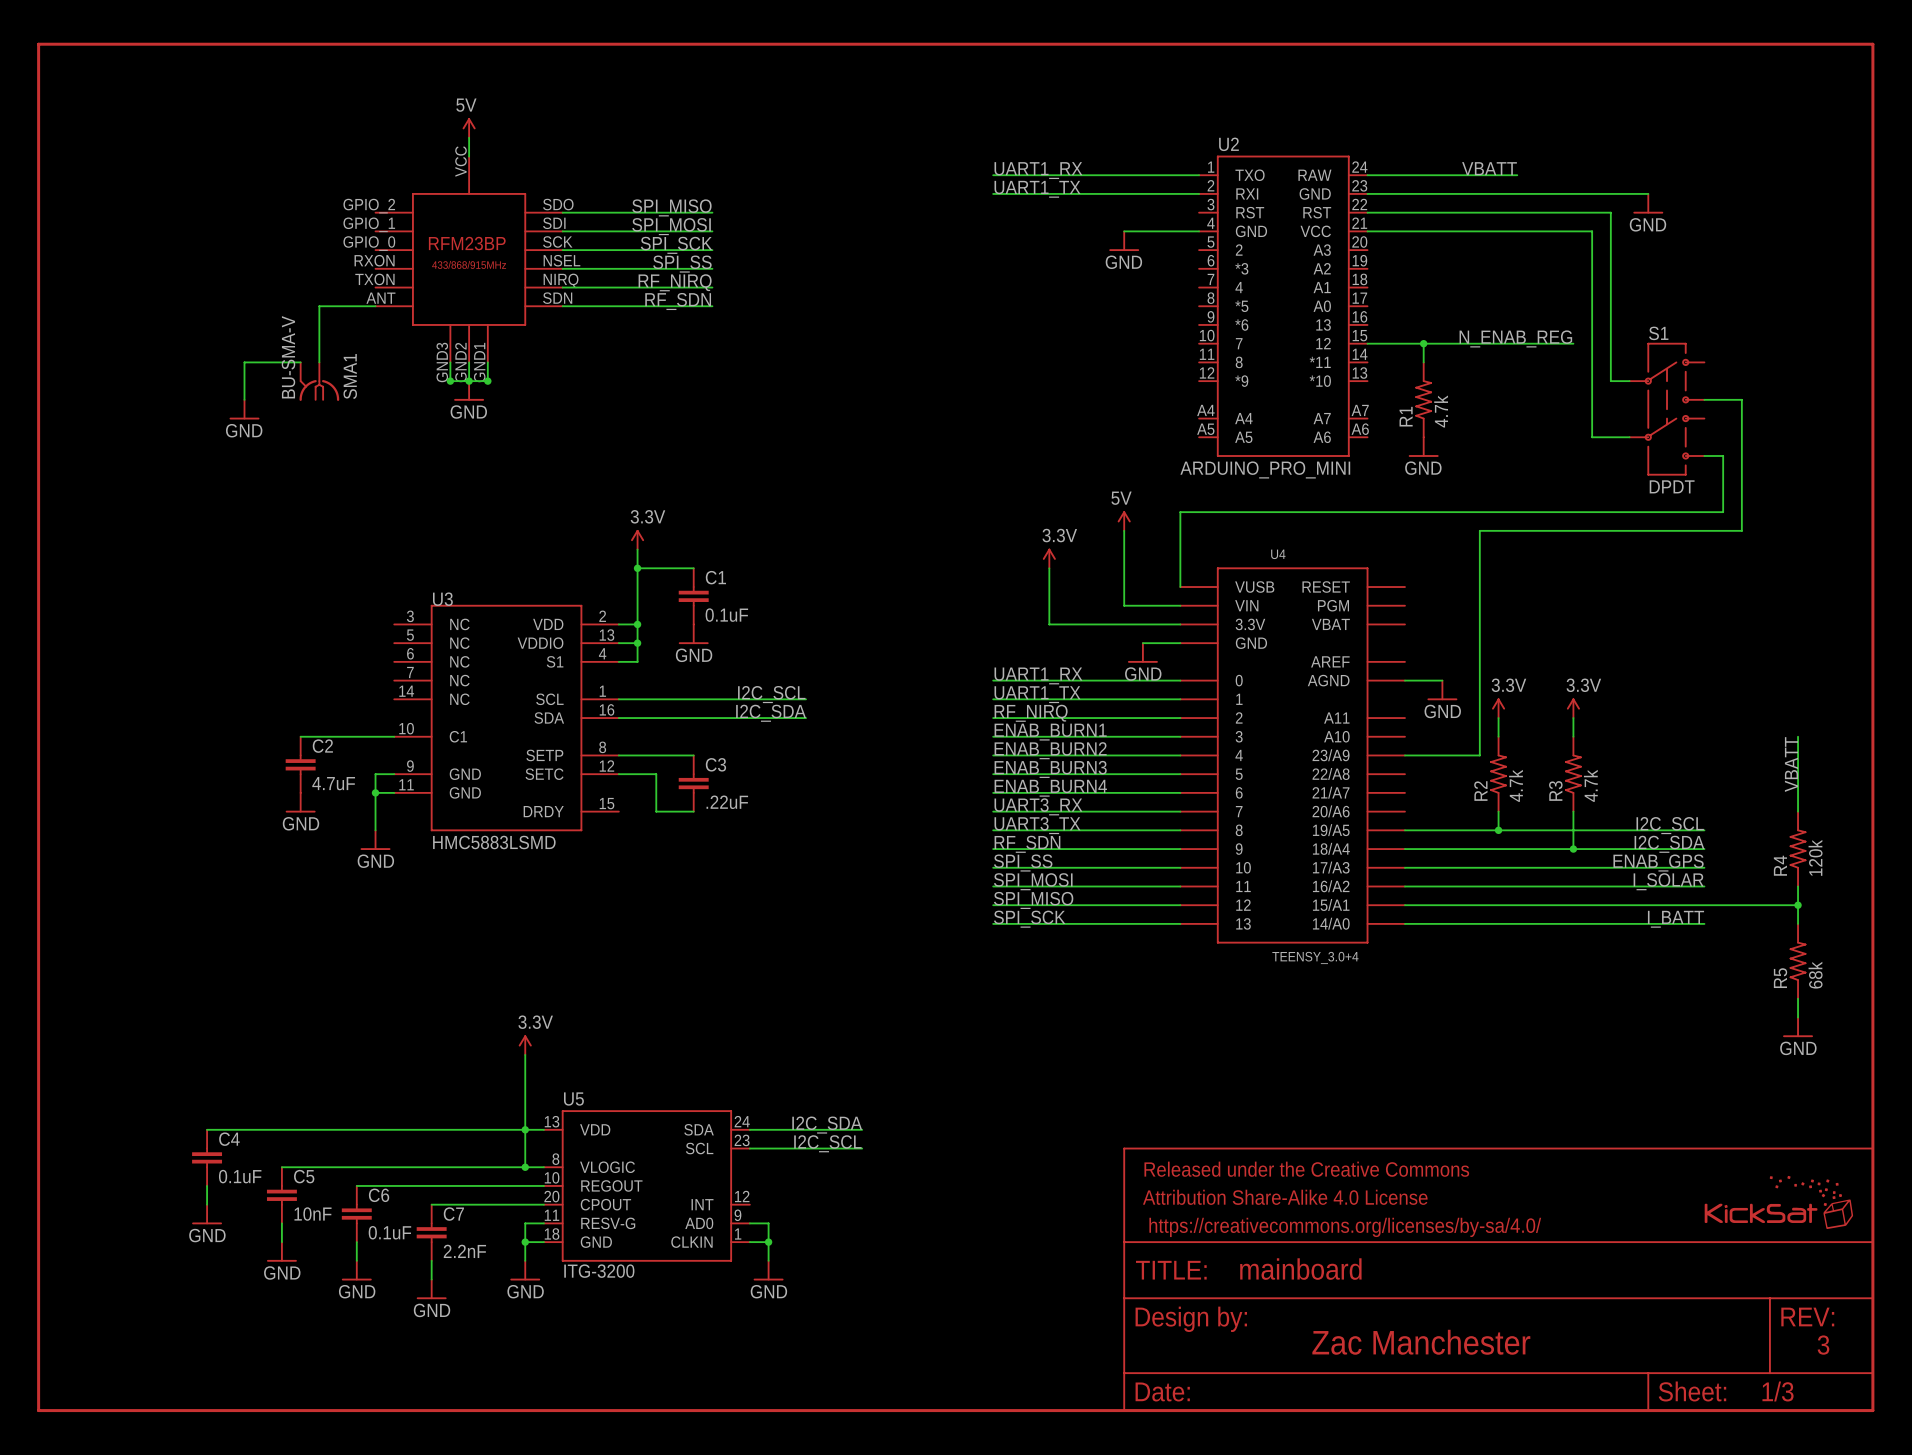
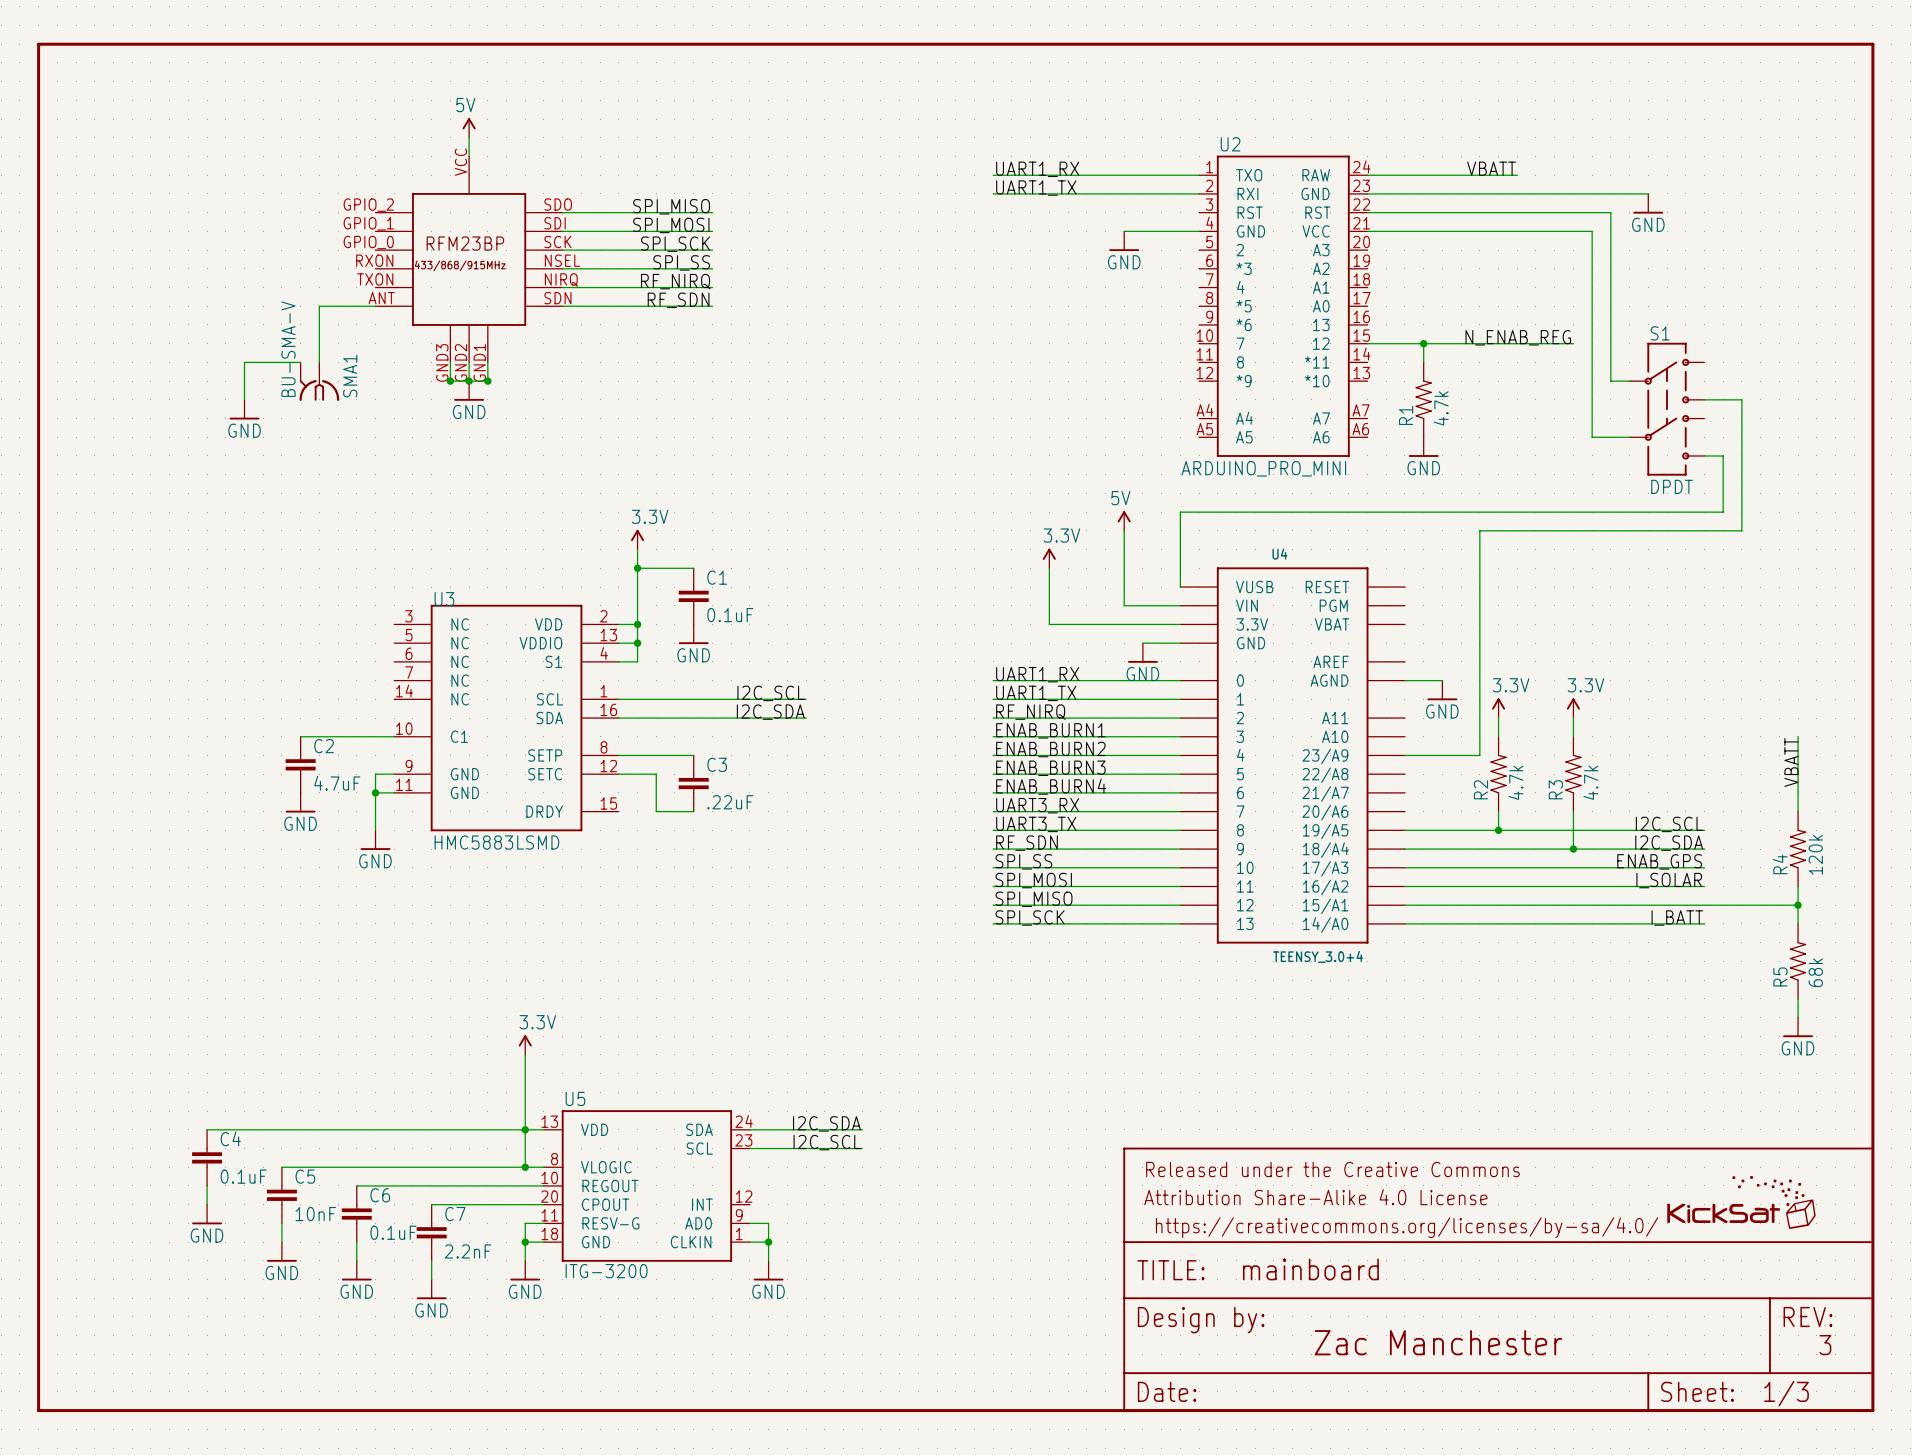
part position: (1778, 1202) -> (1741, 1202)

